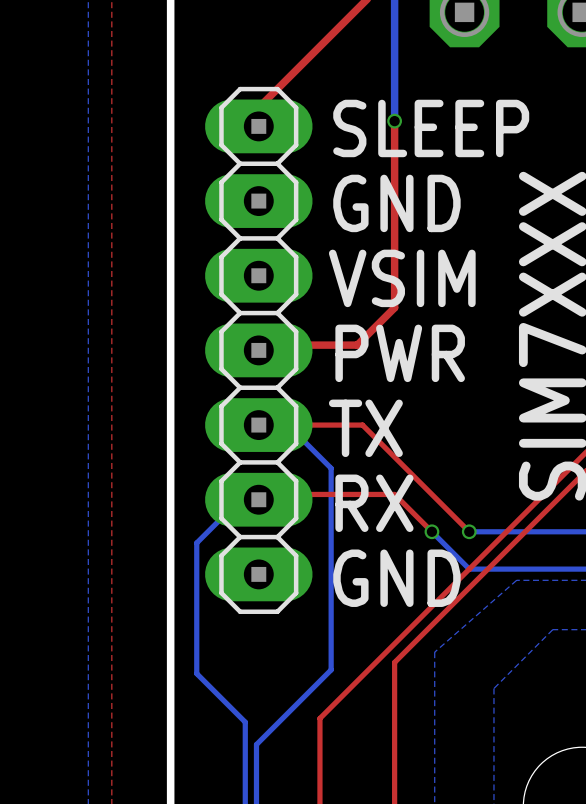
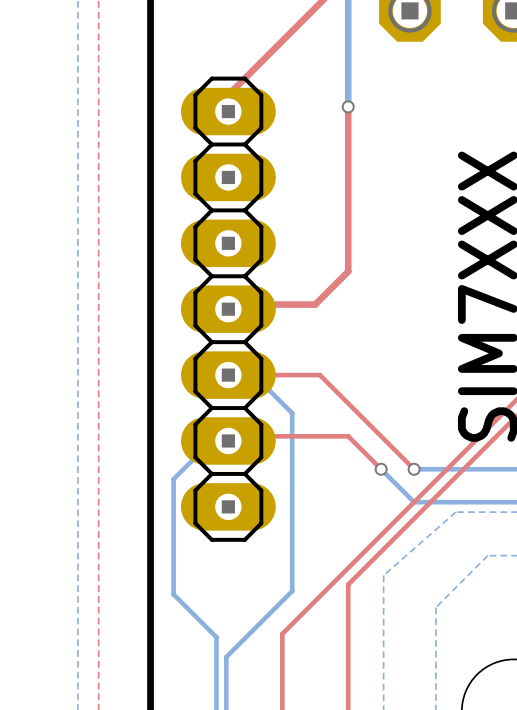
text: SLEEP (431, 128) -> none
text: GND (396, 203) -> none
text: VSIM (402, 278) -> none
text: PWR (400, 353) -> none
text: TX (365, 428) -> none
text: RX (374, 503) -> none
text: GND (396, 578) -> none

